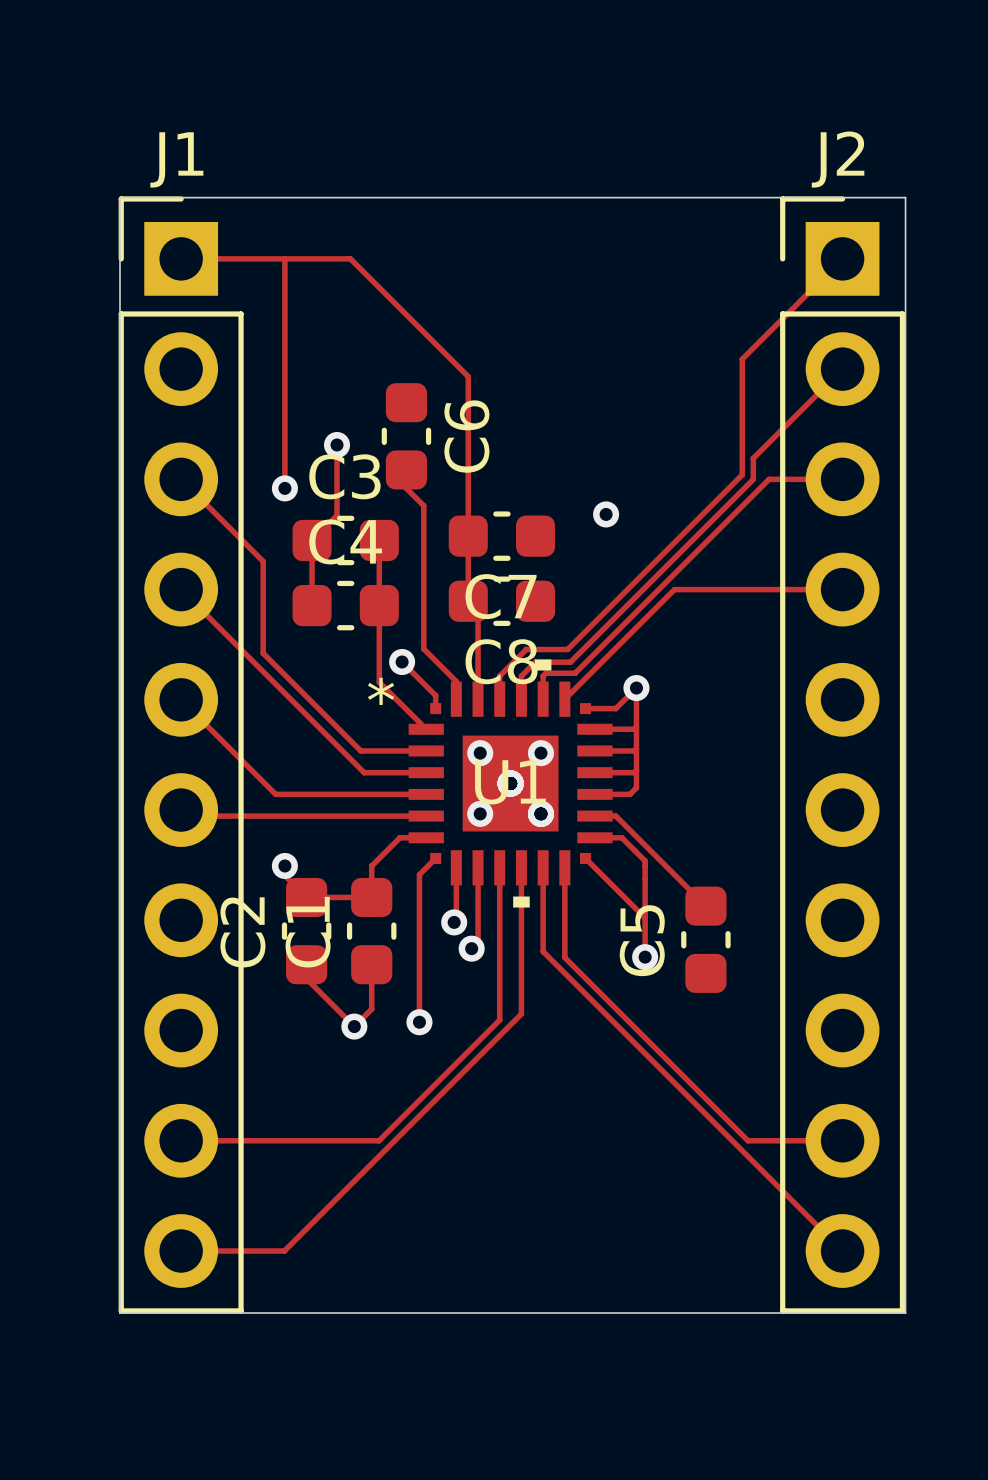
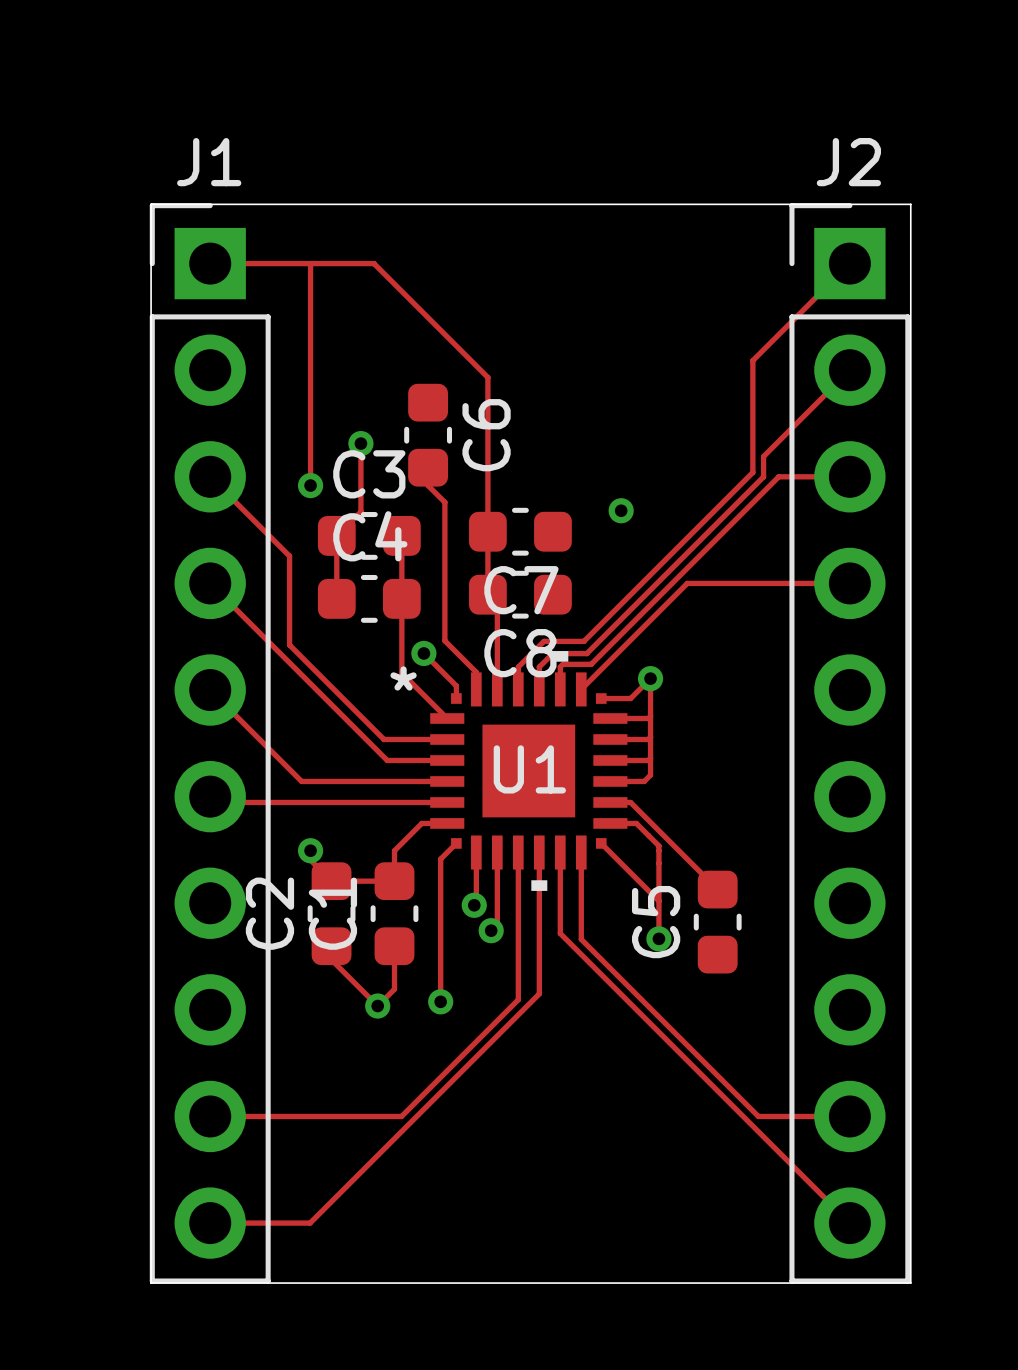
via: (480, 753) -> none
via: (540, 753) -> none
via: (510, 783) -> none
via: (480, 813) -> none
via: (540, 813) -> none

